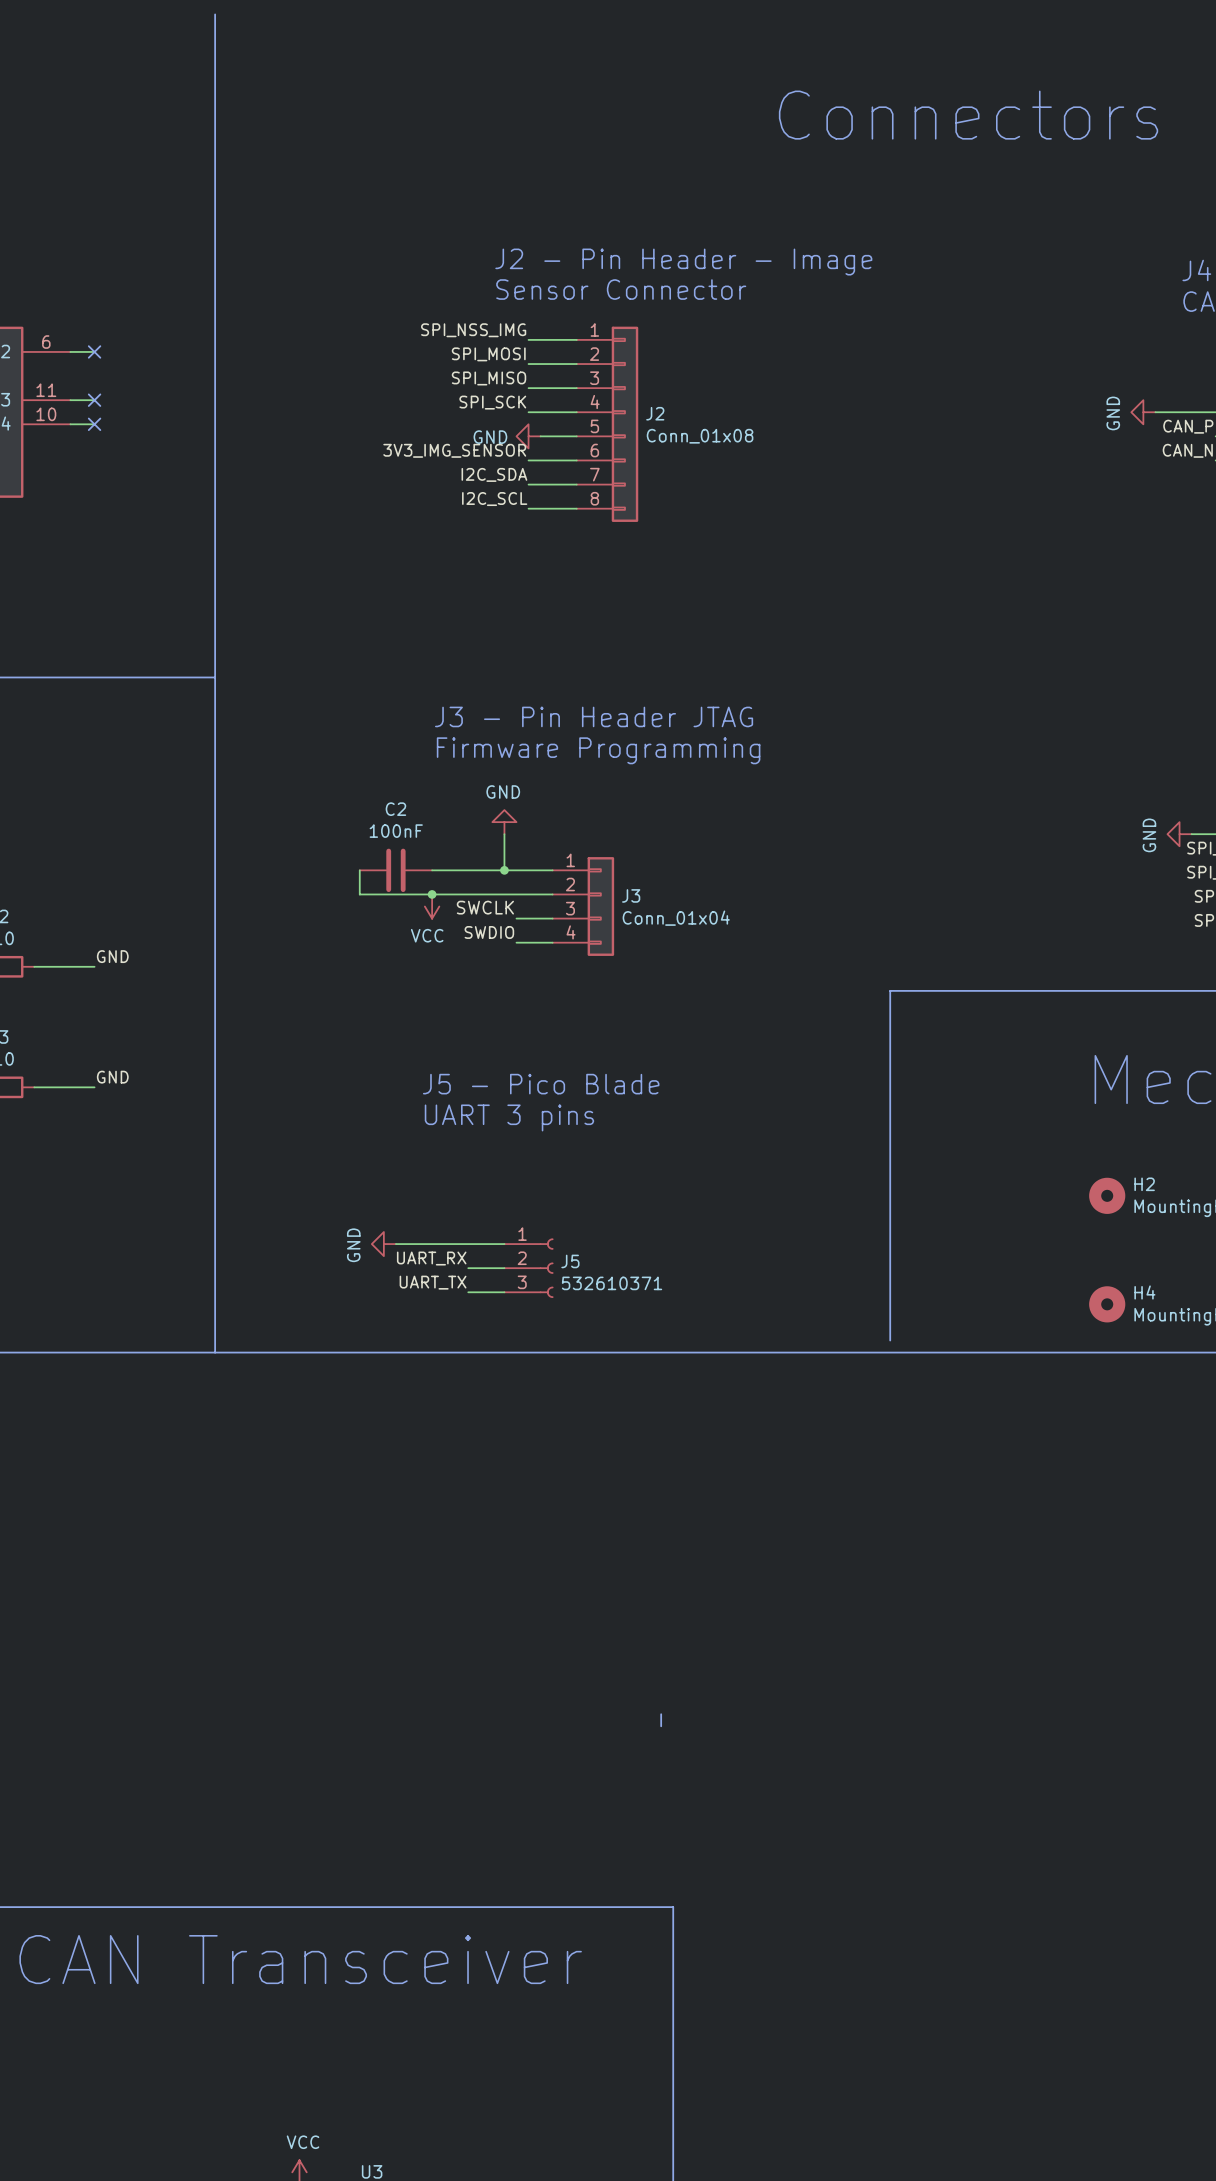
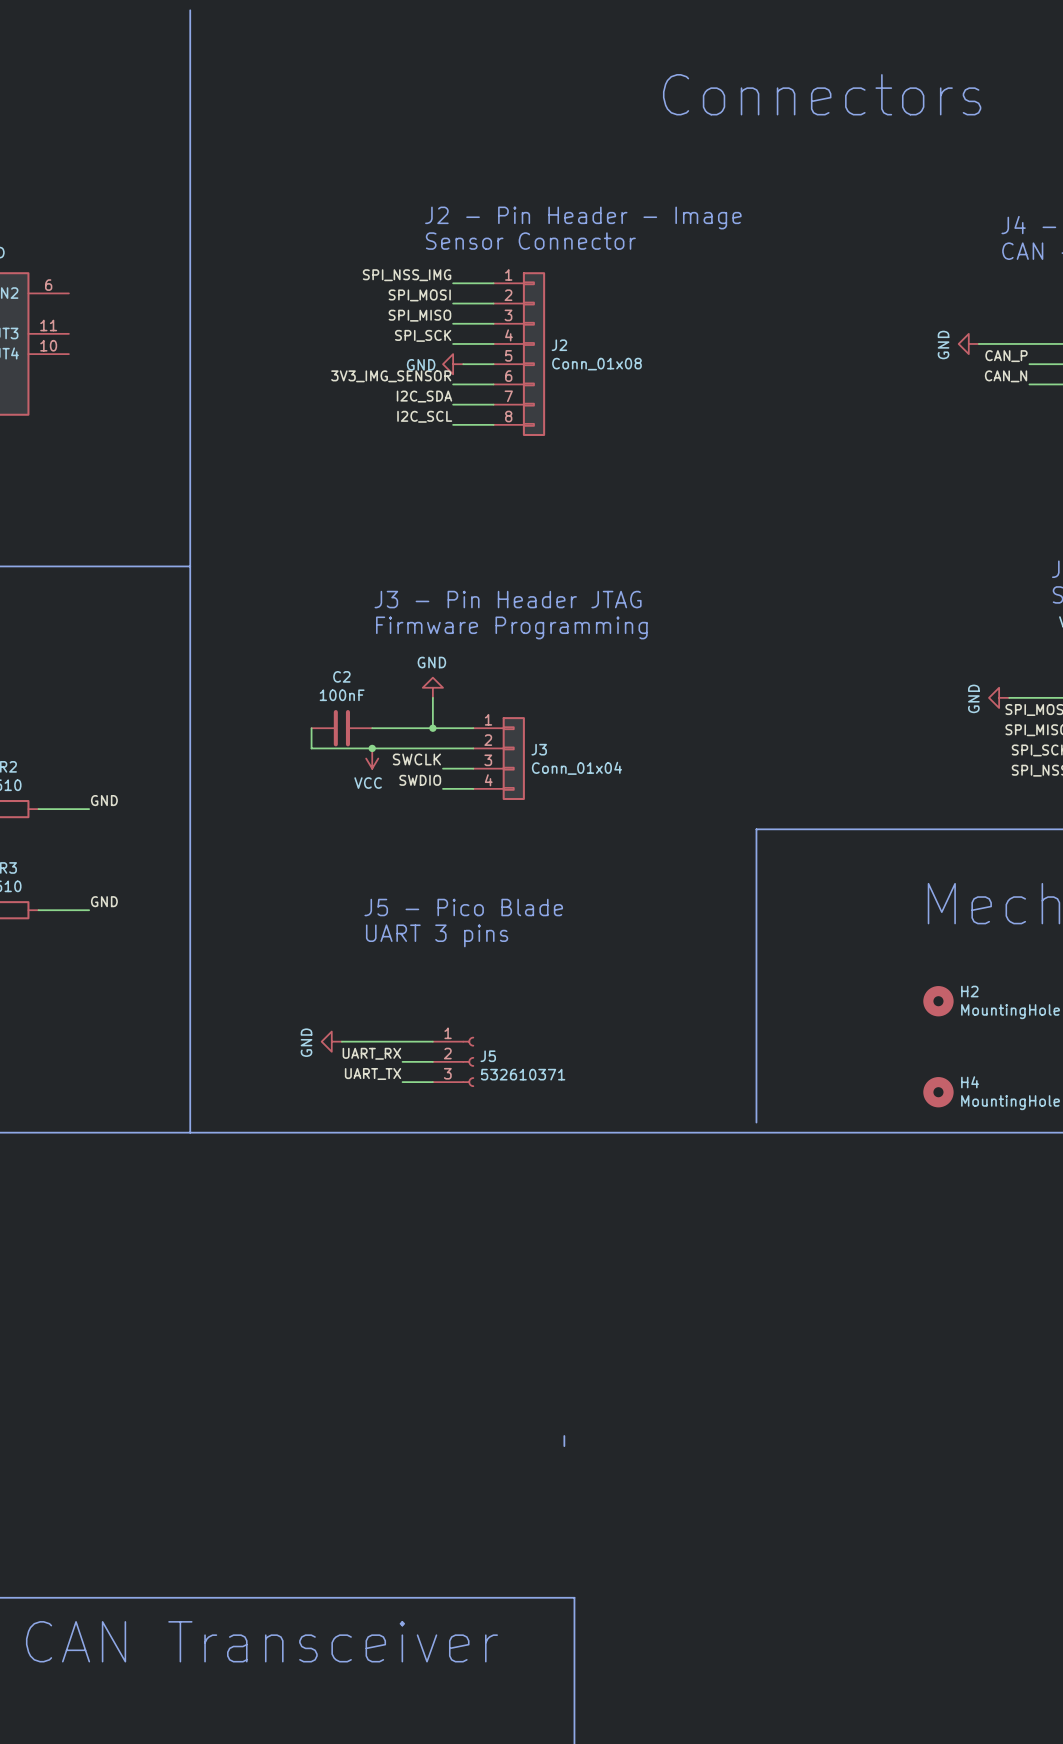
wire: (70, 351) (94, 351) -> none
no-connect mark: (94, 351) -> none
wire: (70, 400) (94, 400) -> none
no-connect mark: (94, 400) -> none
wire: (70, 424) (94, 424) -> none
no-connect mark: (94, 424) -> none

